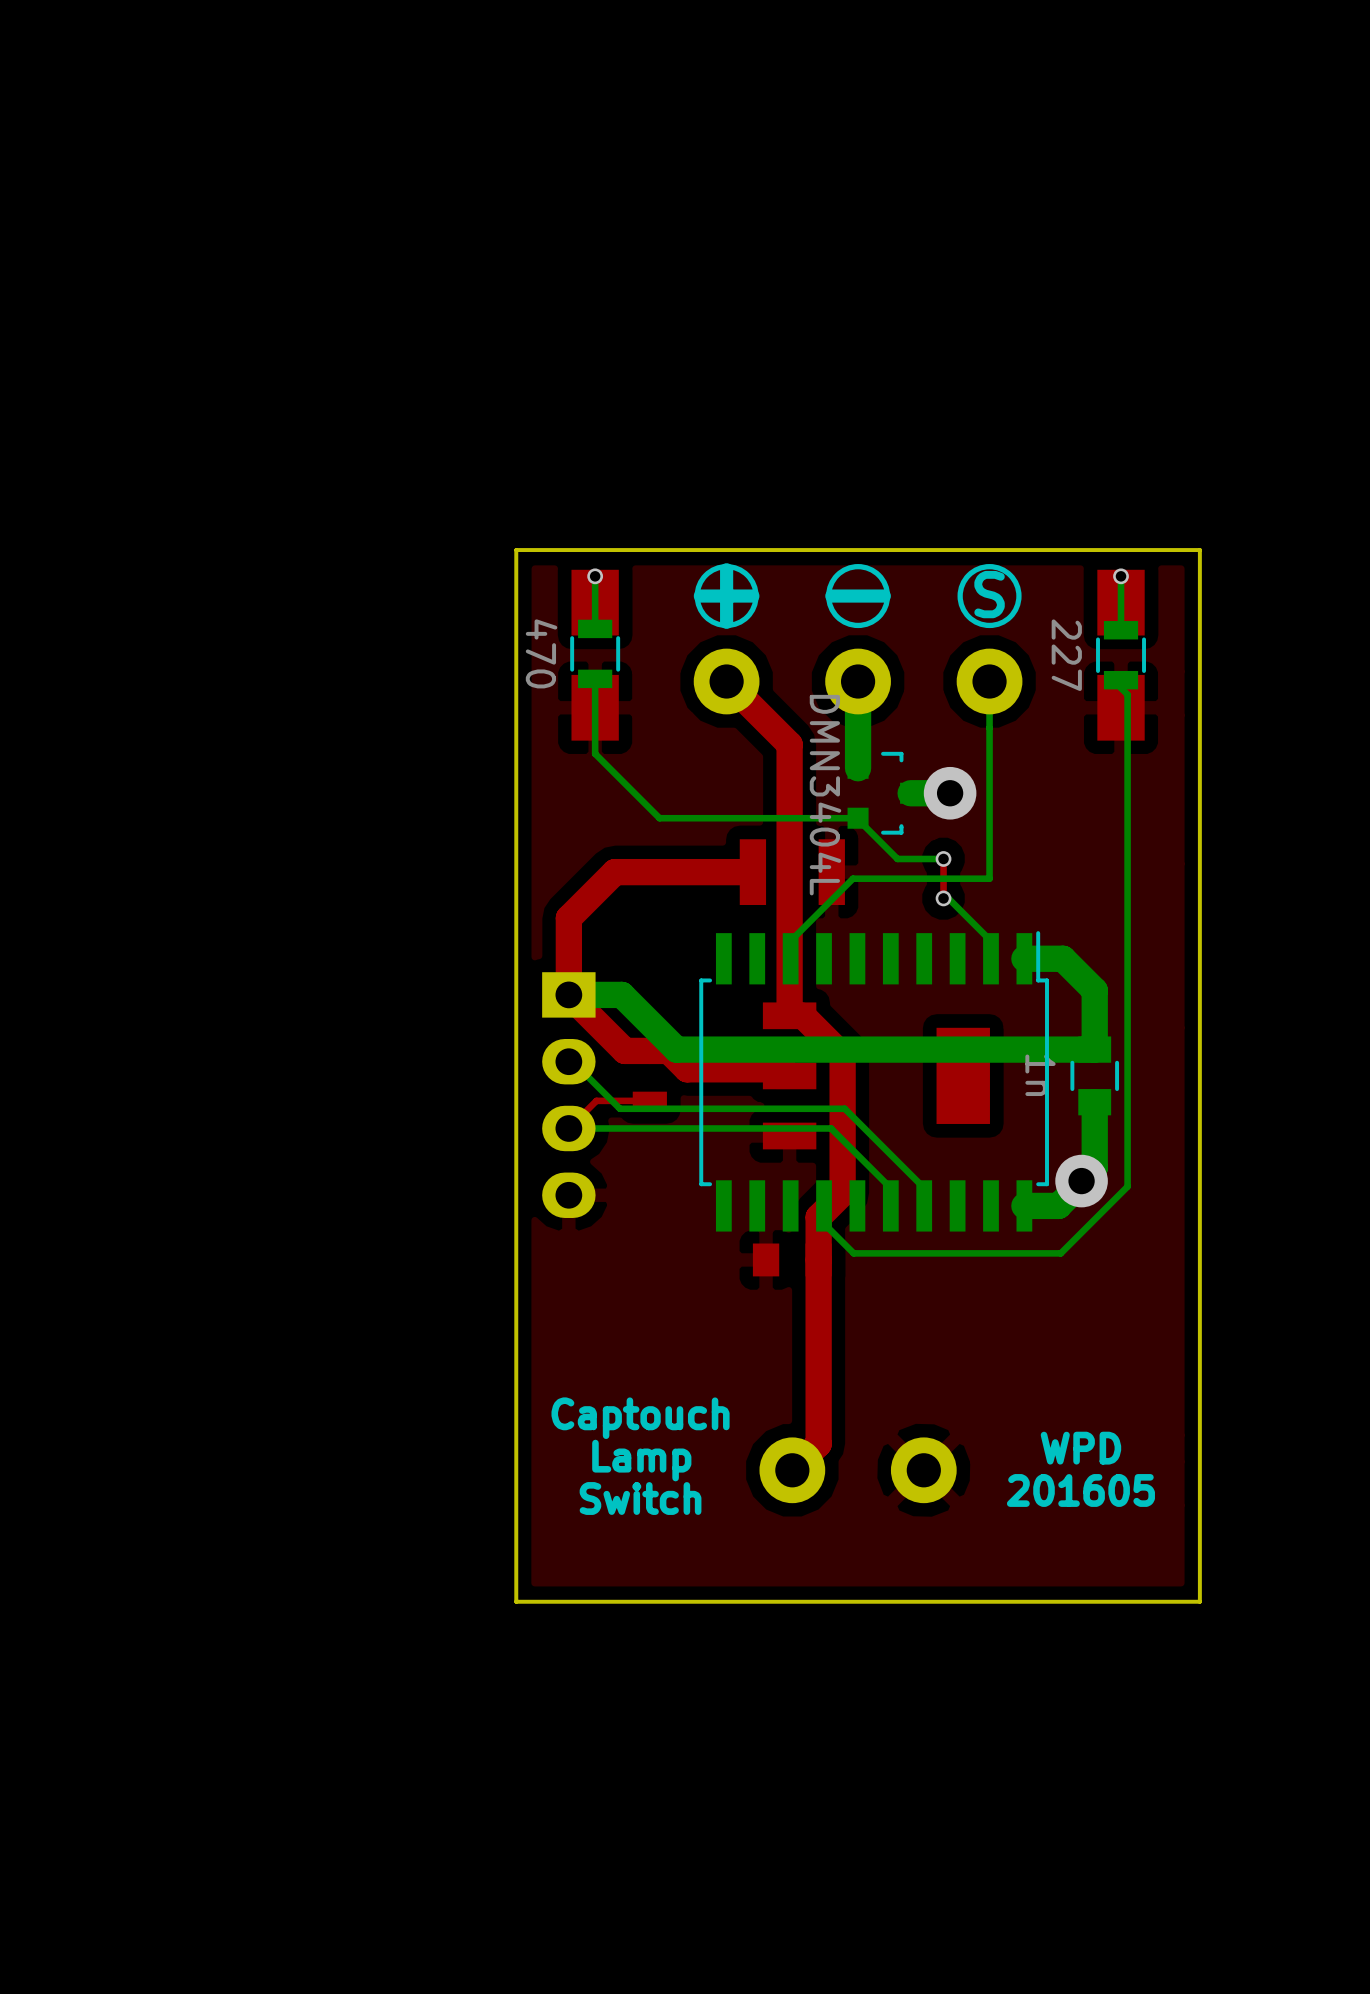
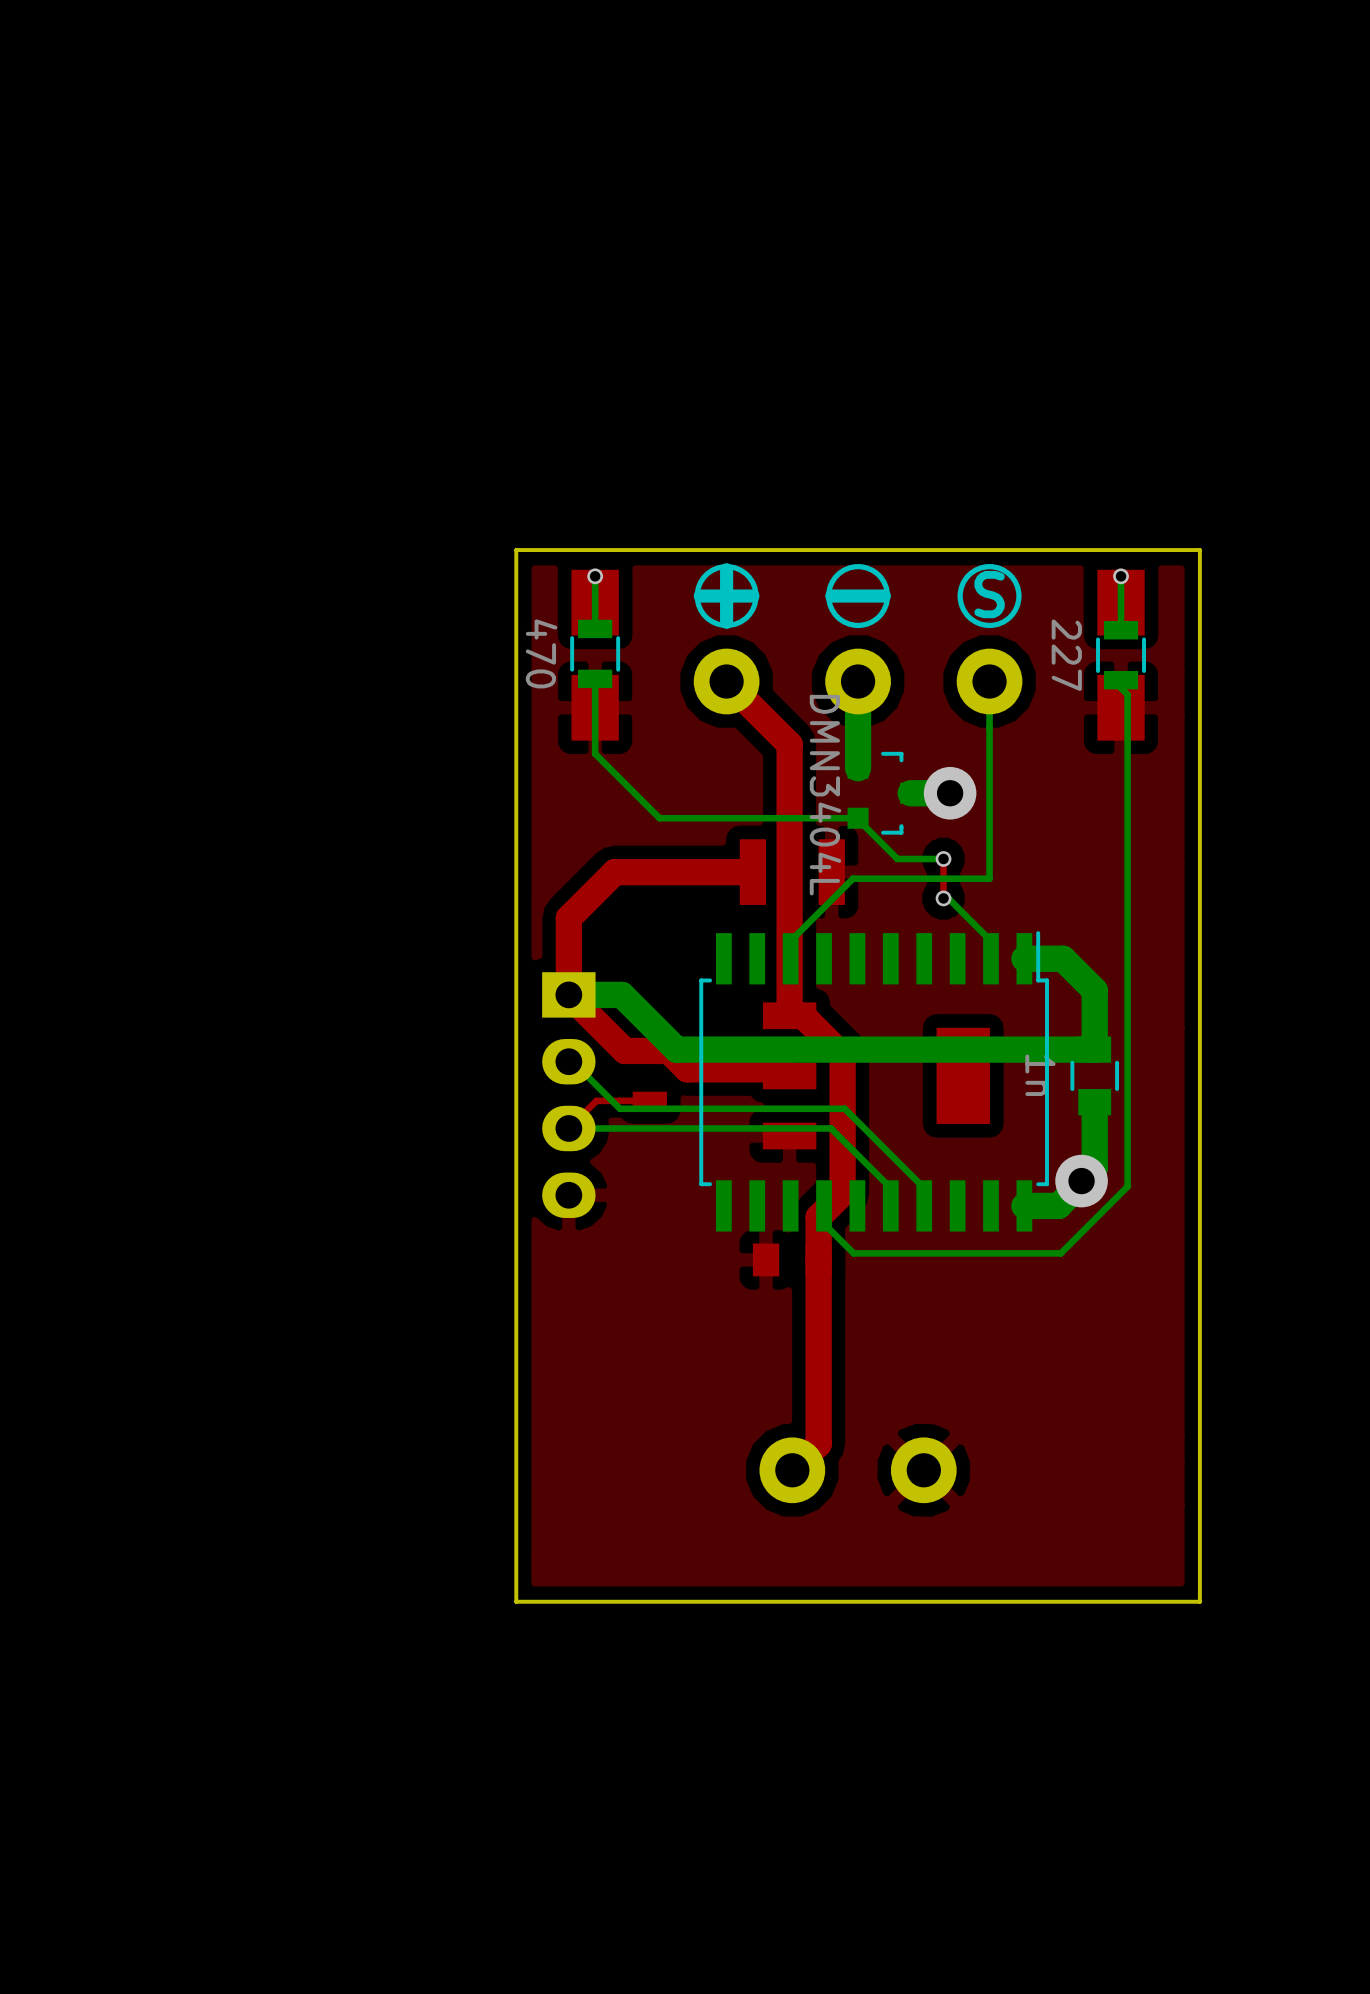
text: Captouch (640, 1418) -> none
text: WPD (1080, 1448) -> none
text: Lamp (641, 1460) -> none
text: 201605 (1080, 1490) -> none
text: Switch (640, 1498) -> none

